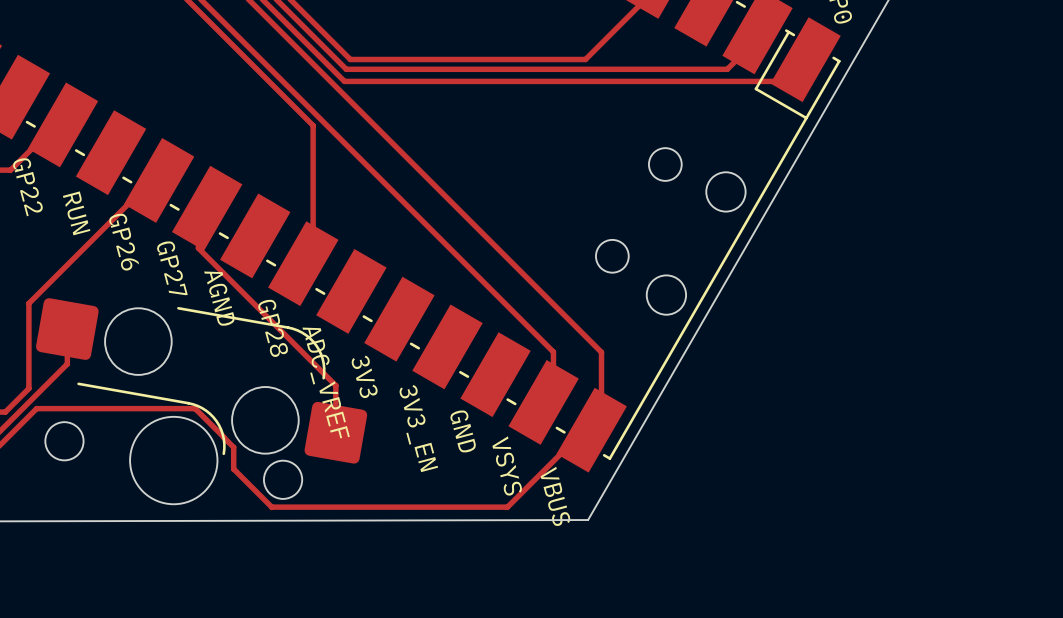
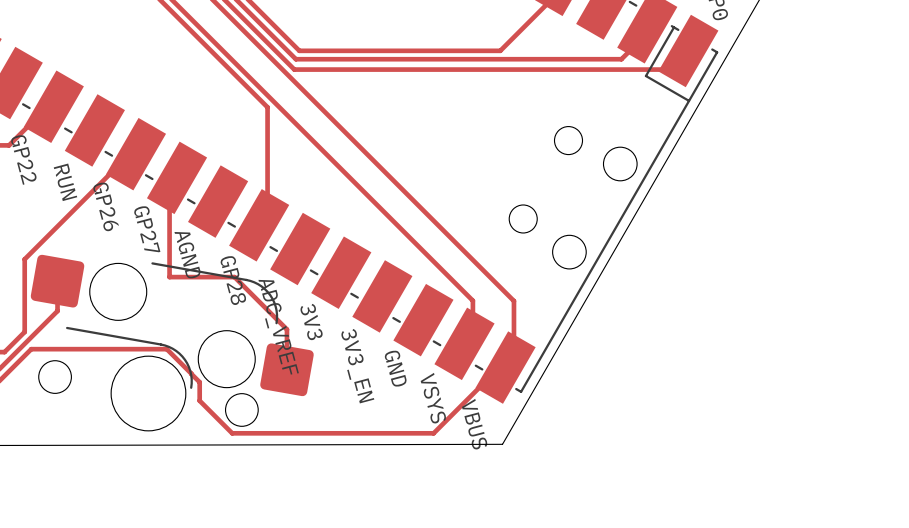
top track: (198, 248) (274, 324) -> (169, 212) (169, 277) (234, 277)

